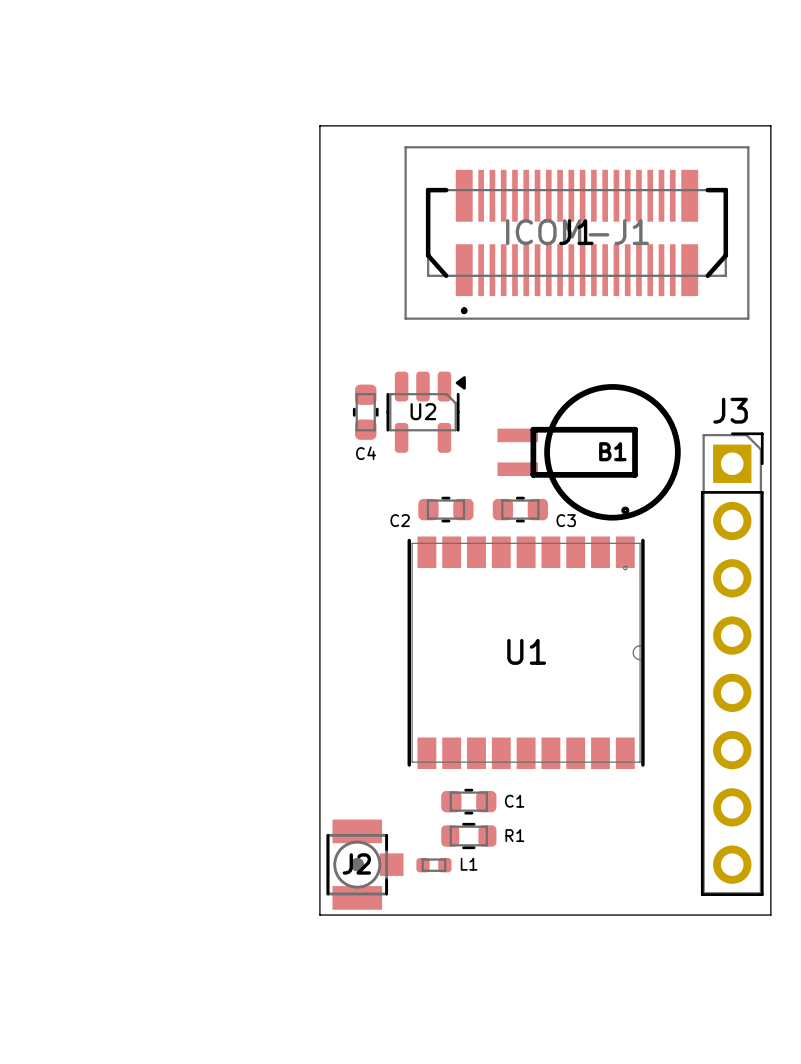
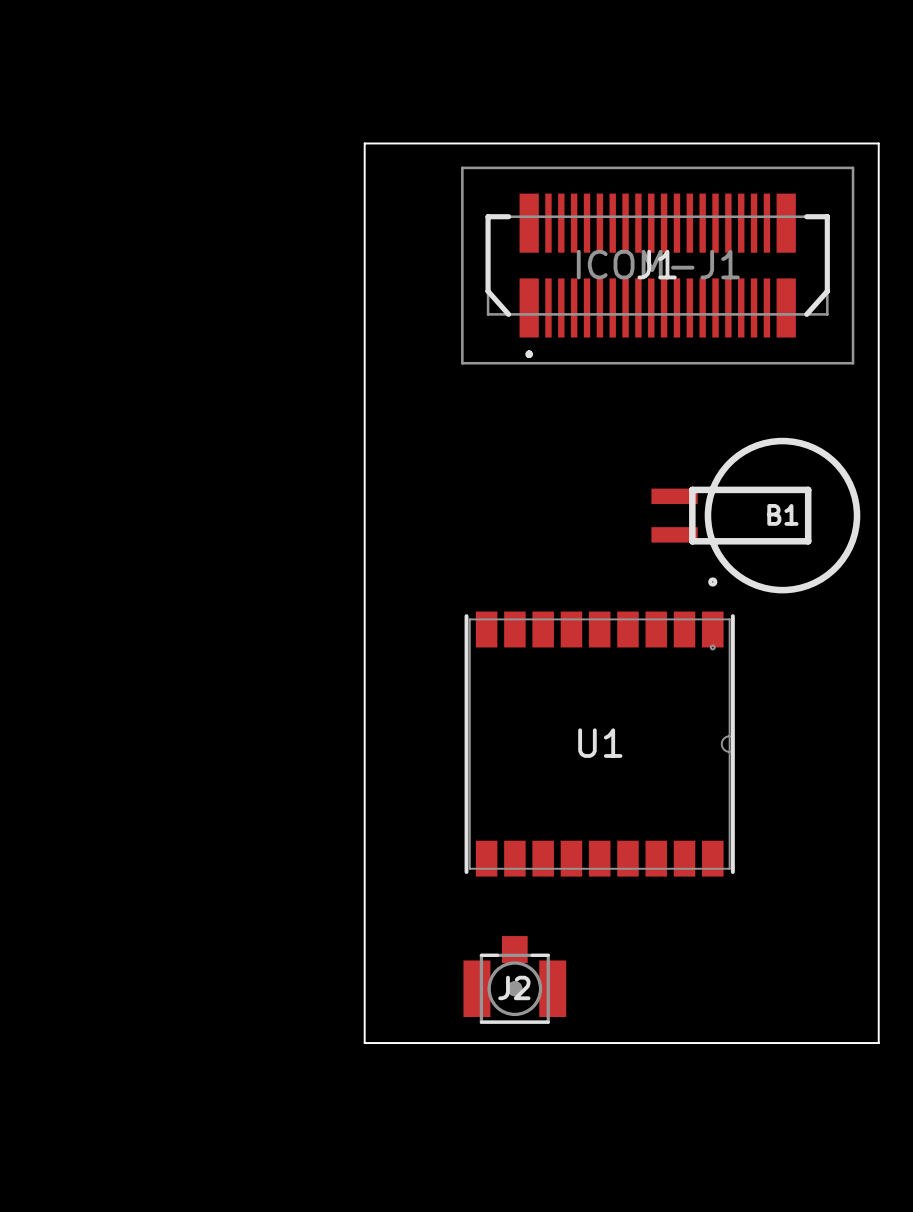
C4: (365, 412) -> none
U2: (426, 412) -> none
B1 position: (589, 452) -> (755, 515)
C2: (445, 509) -> none
C3: (520, 509) -> none
J3: (732, 664) -> none
C1: (468, 801) -> none
R1: (468, 836) -> none
J2 rotation: 0° (365, 864) -> 90° counterclockwise (514, 979)
J2 position: (365, 864) -> (514, 979)
L1: (433, 865) -> none

